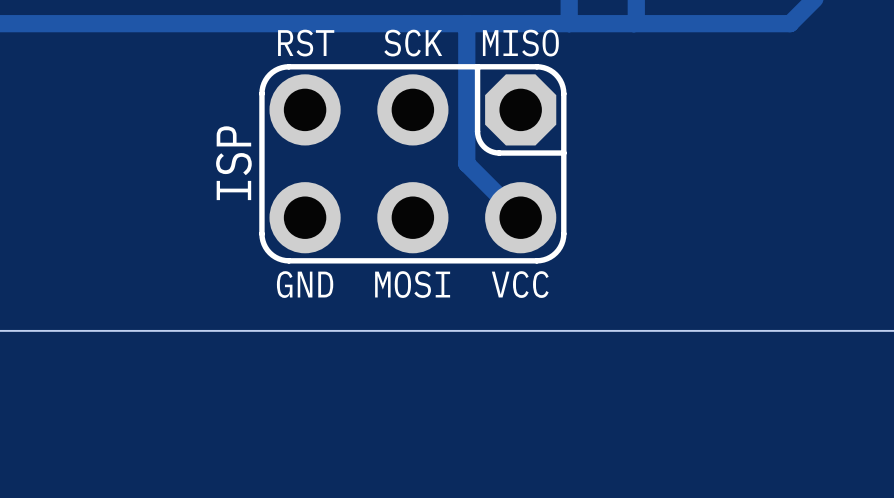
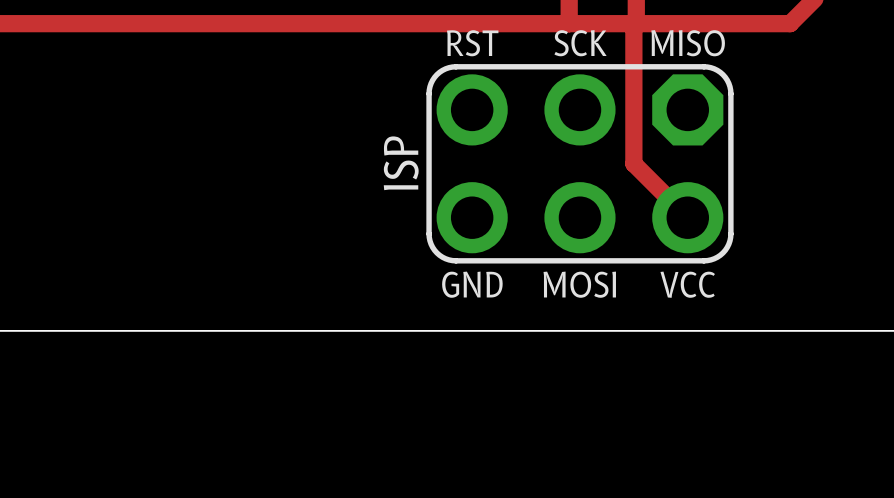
track: (466, 23) (466, 163) (520, 217) -> (633, 23) (633, 163) (687, 217)
part: (412, 163) -> none
part: none -> (579, 163)

